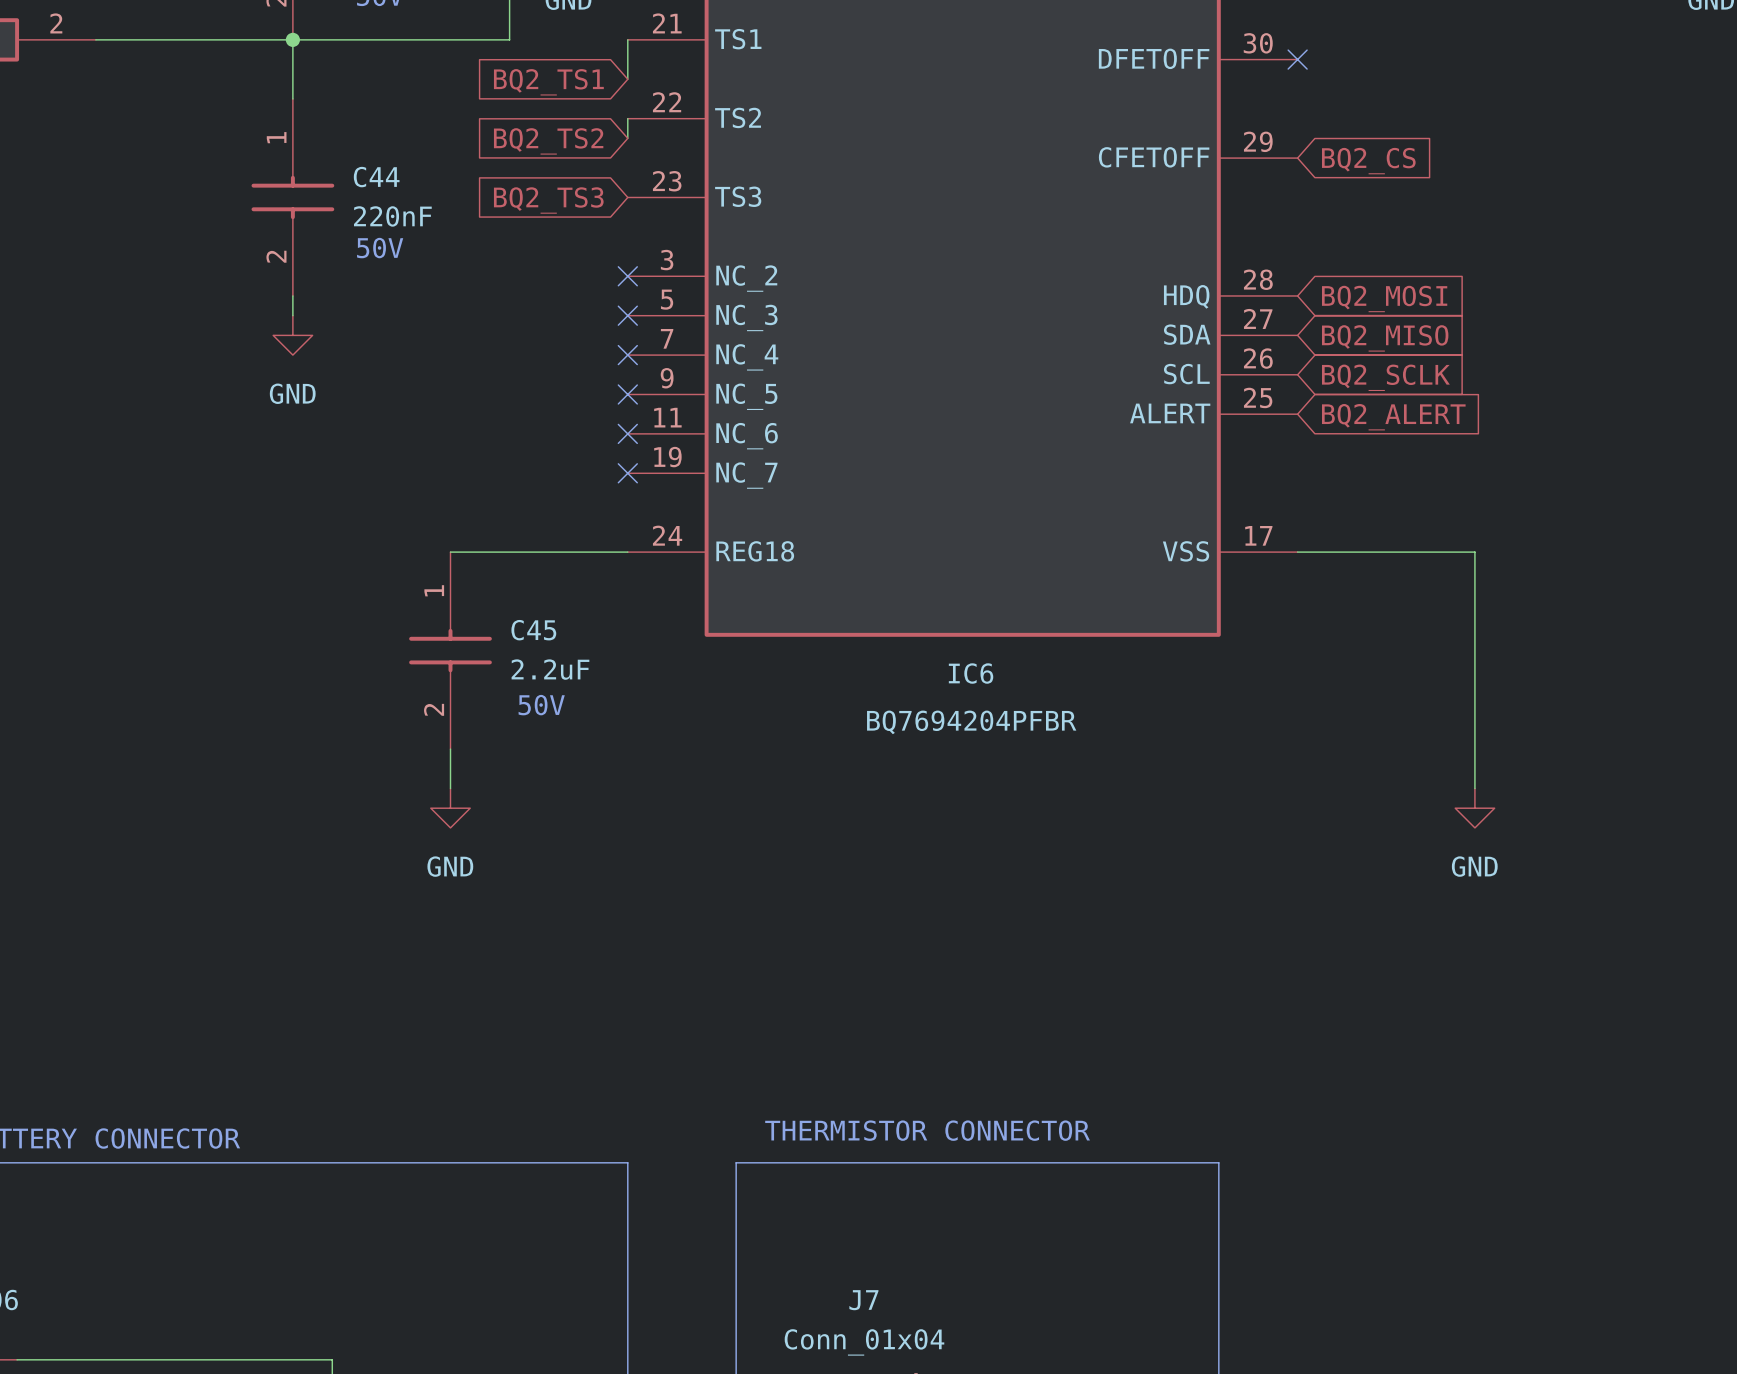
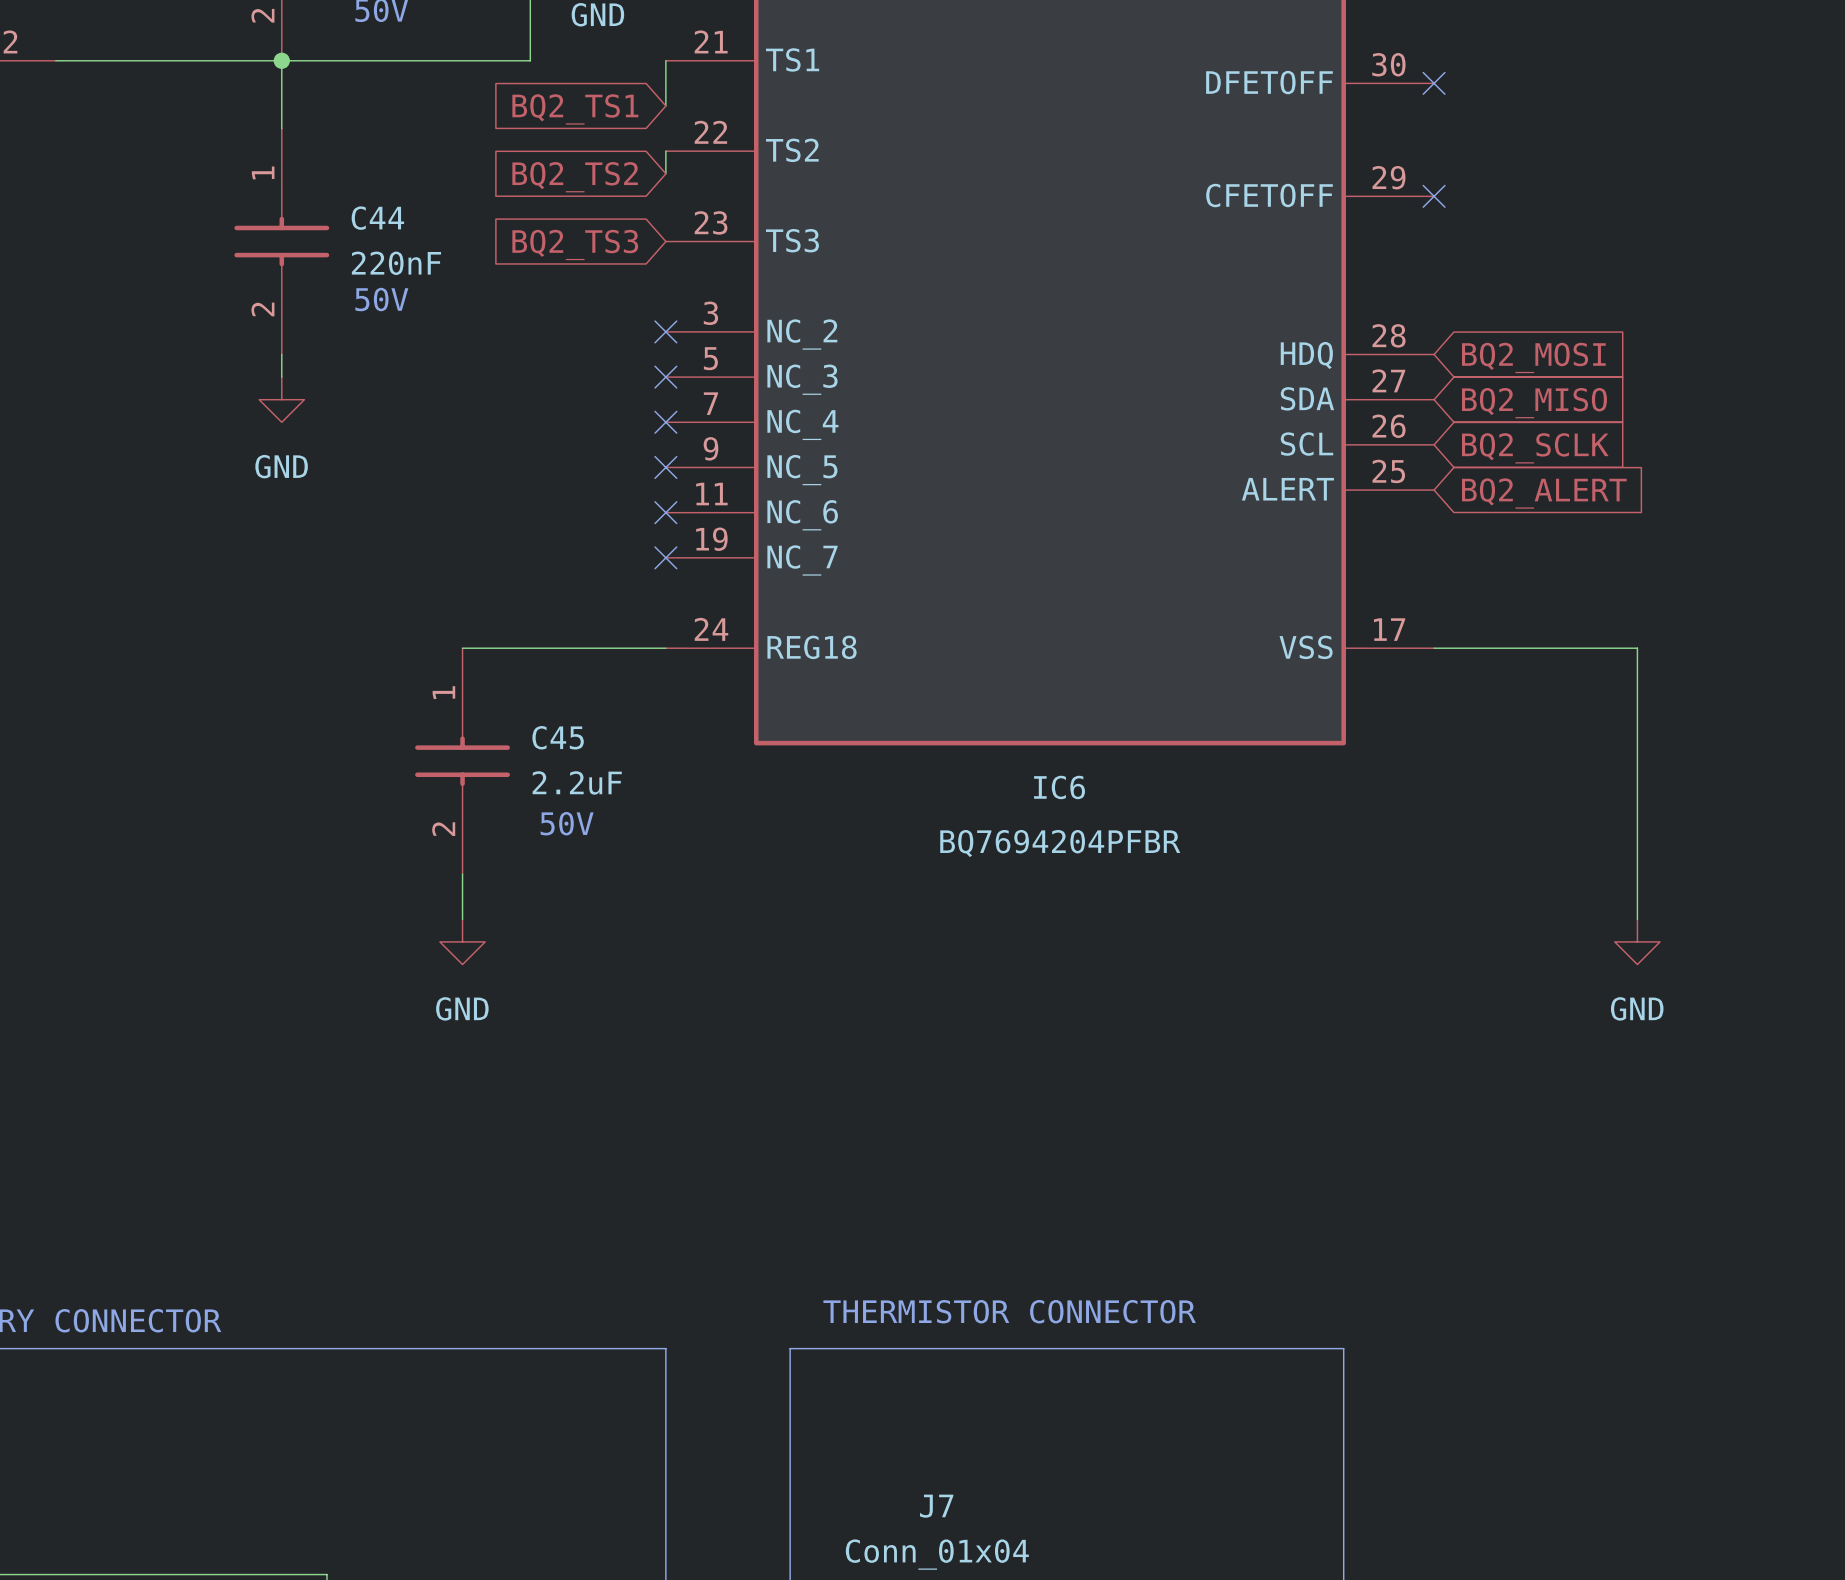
no-connect mark: none -> (1434, 196)
global label: BQ2_CS (1368, 161) -> none

